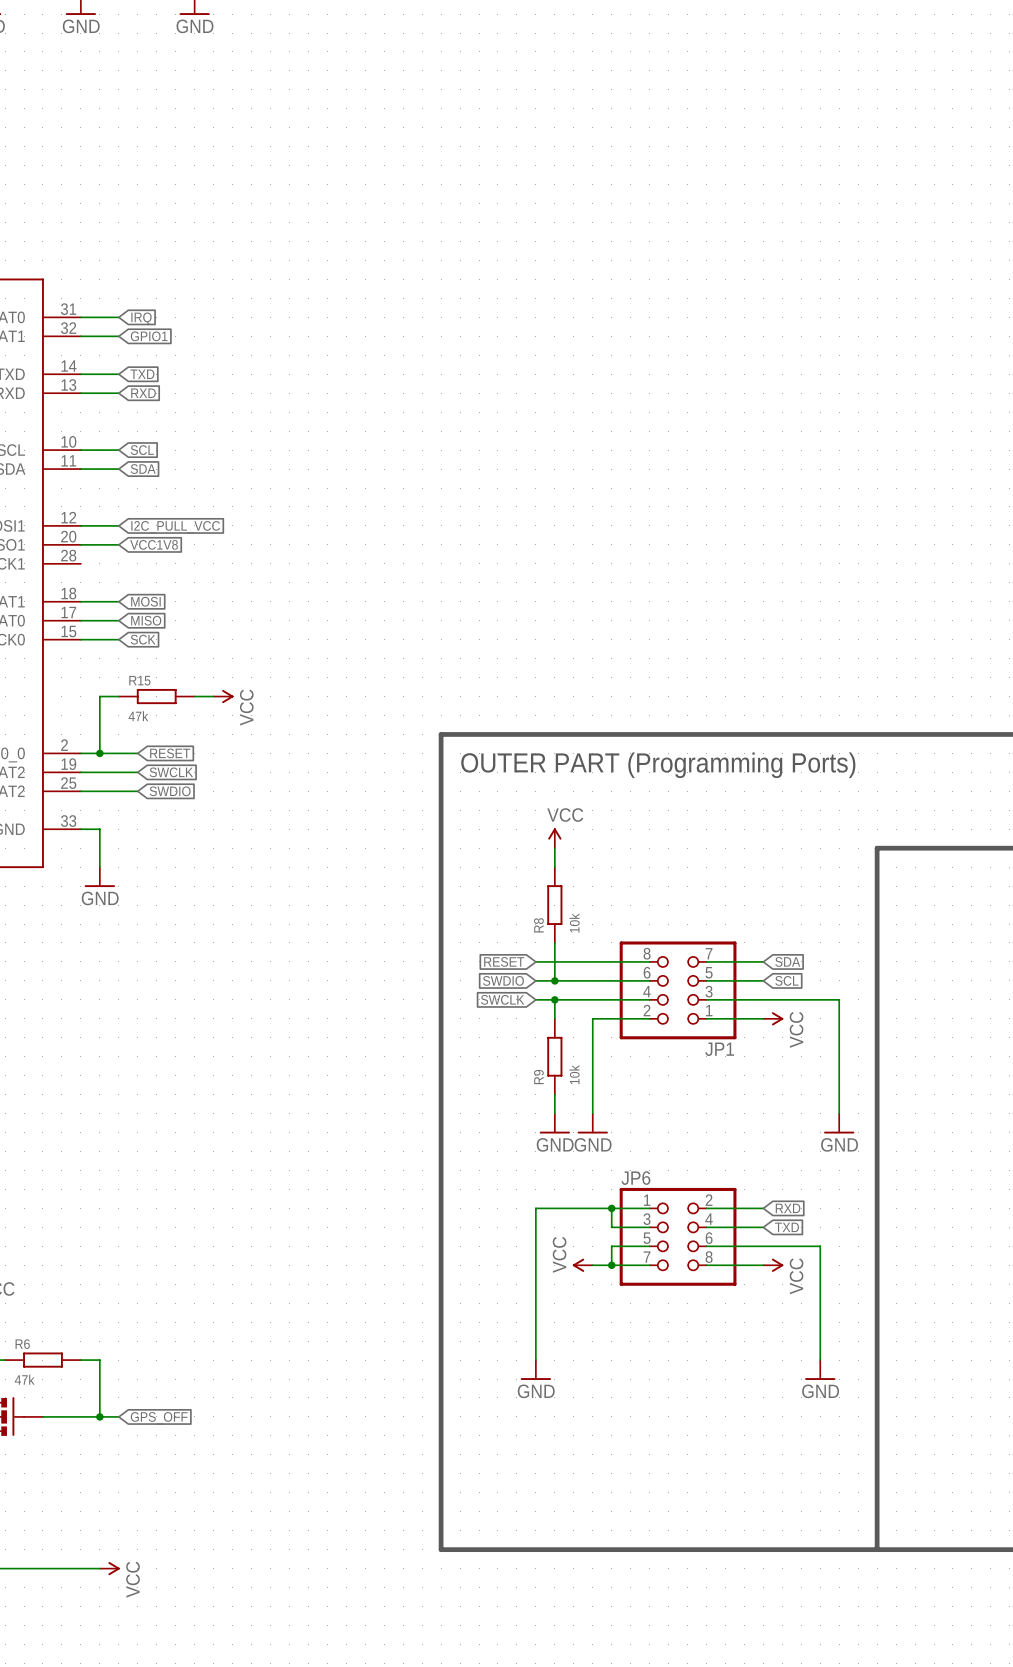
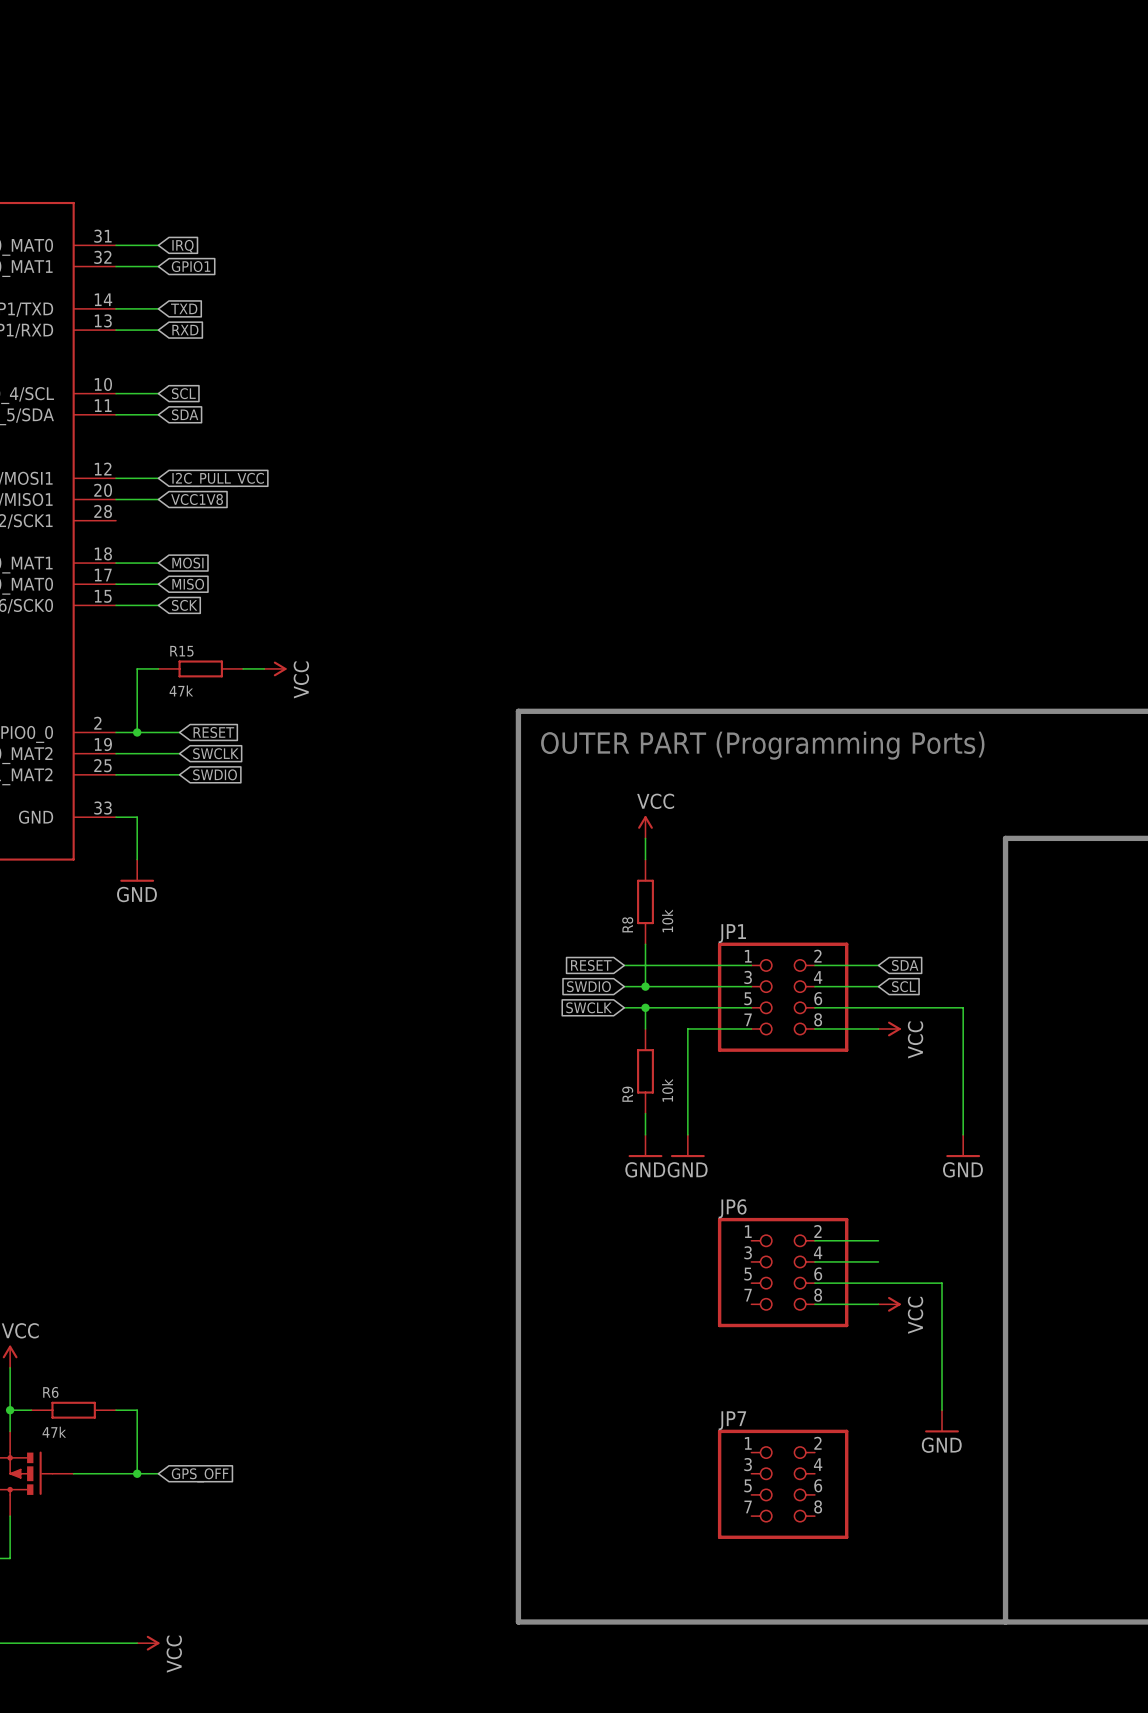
JP1 rotation: 0° (678, 990) -> 180° (783, 997)
wire: (611, 1208) (611, 1227) (649, 1227) -> none
junction: (611, 1208) -> none
wire: (649, 1208) (535, 1208) (535, 1360) -> none
global label: RXD (788, 1208) -> none
global label: TXD (786, 1227) -> none
wire: (649, 1246) (611, 1246) (611, 1265) -> none
power symbol: VCC (582, 1265) -> none
wire: (592, 1265) (649, 1265) -> none
junction: (611, 1265) -> none
power symbol: GND (535, 1370) -> none
JP7: none -> (783, 1484)

